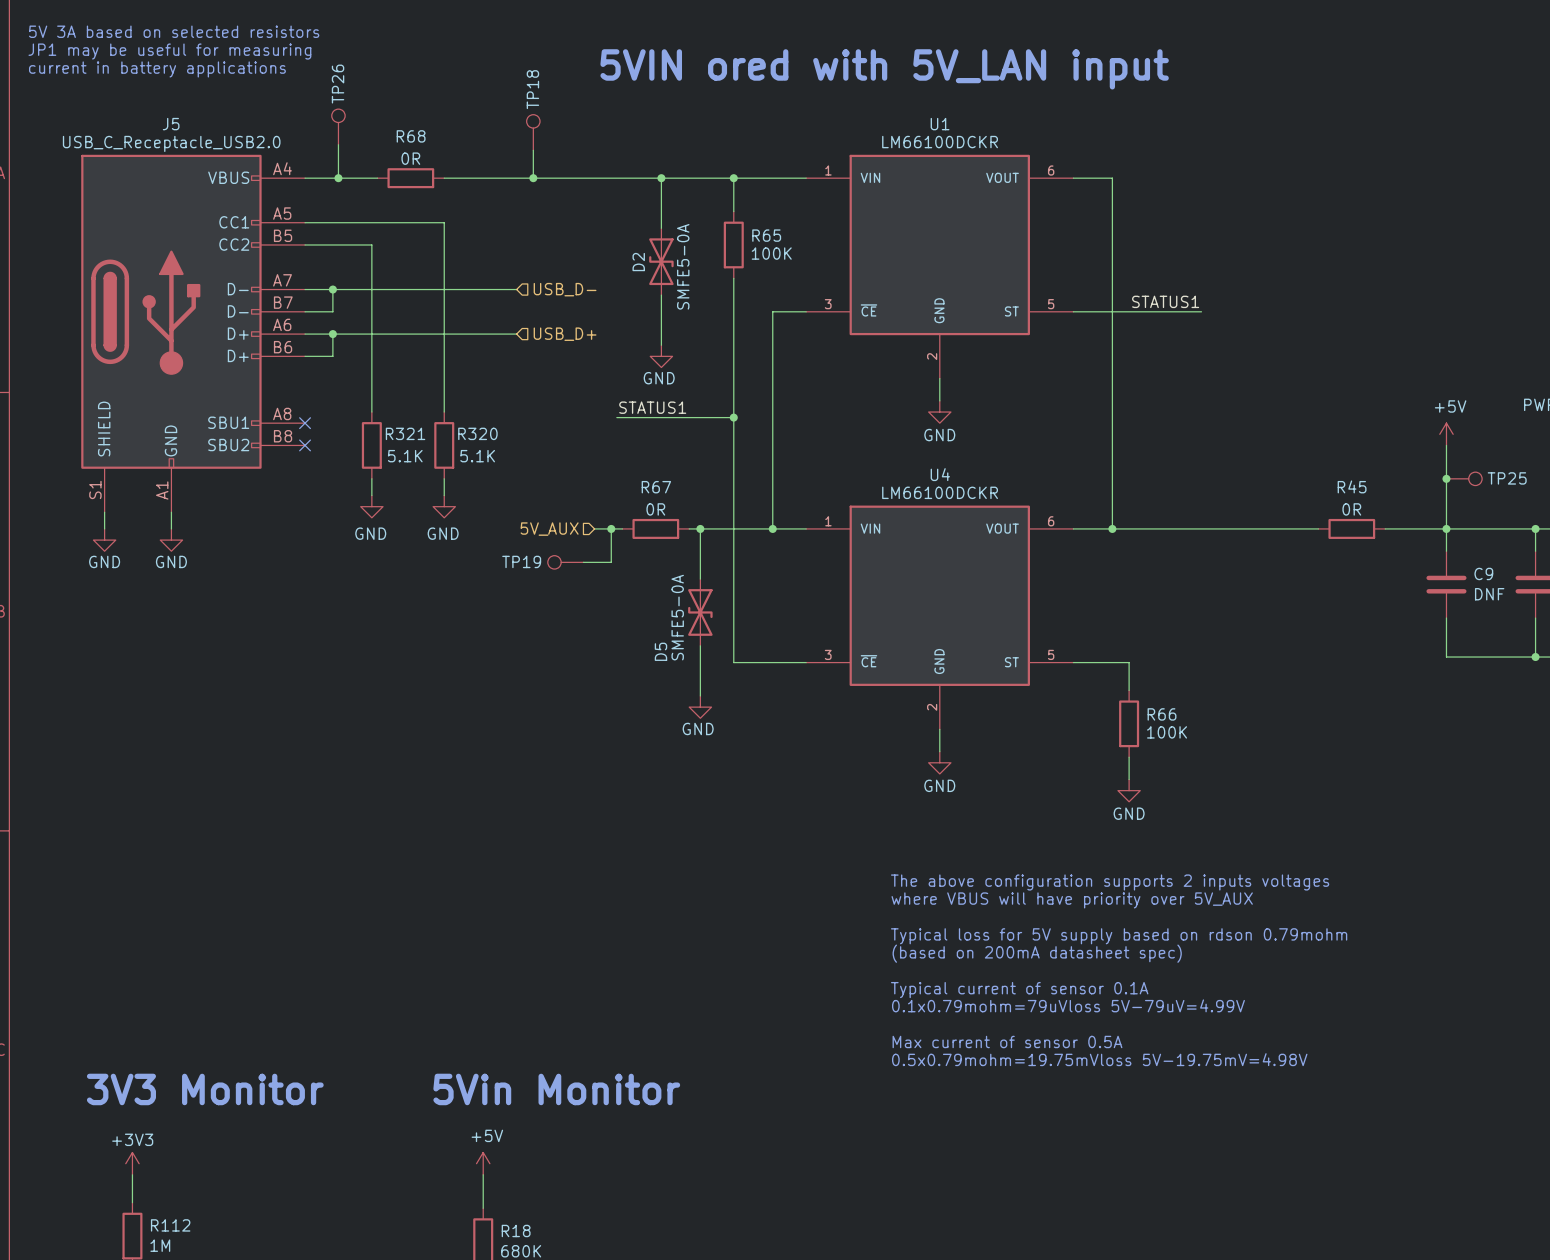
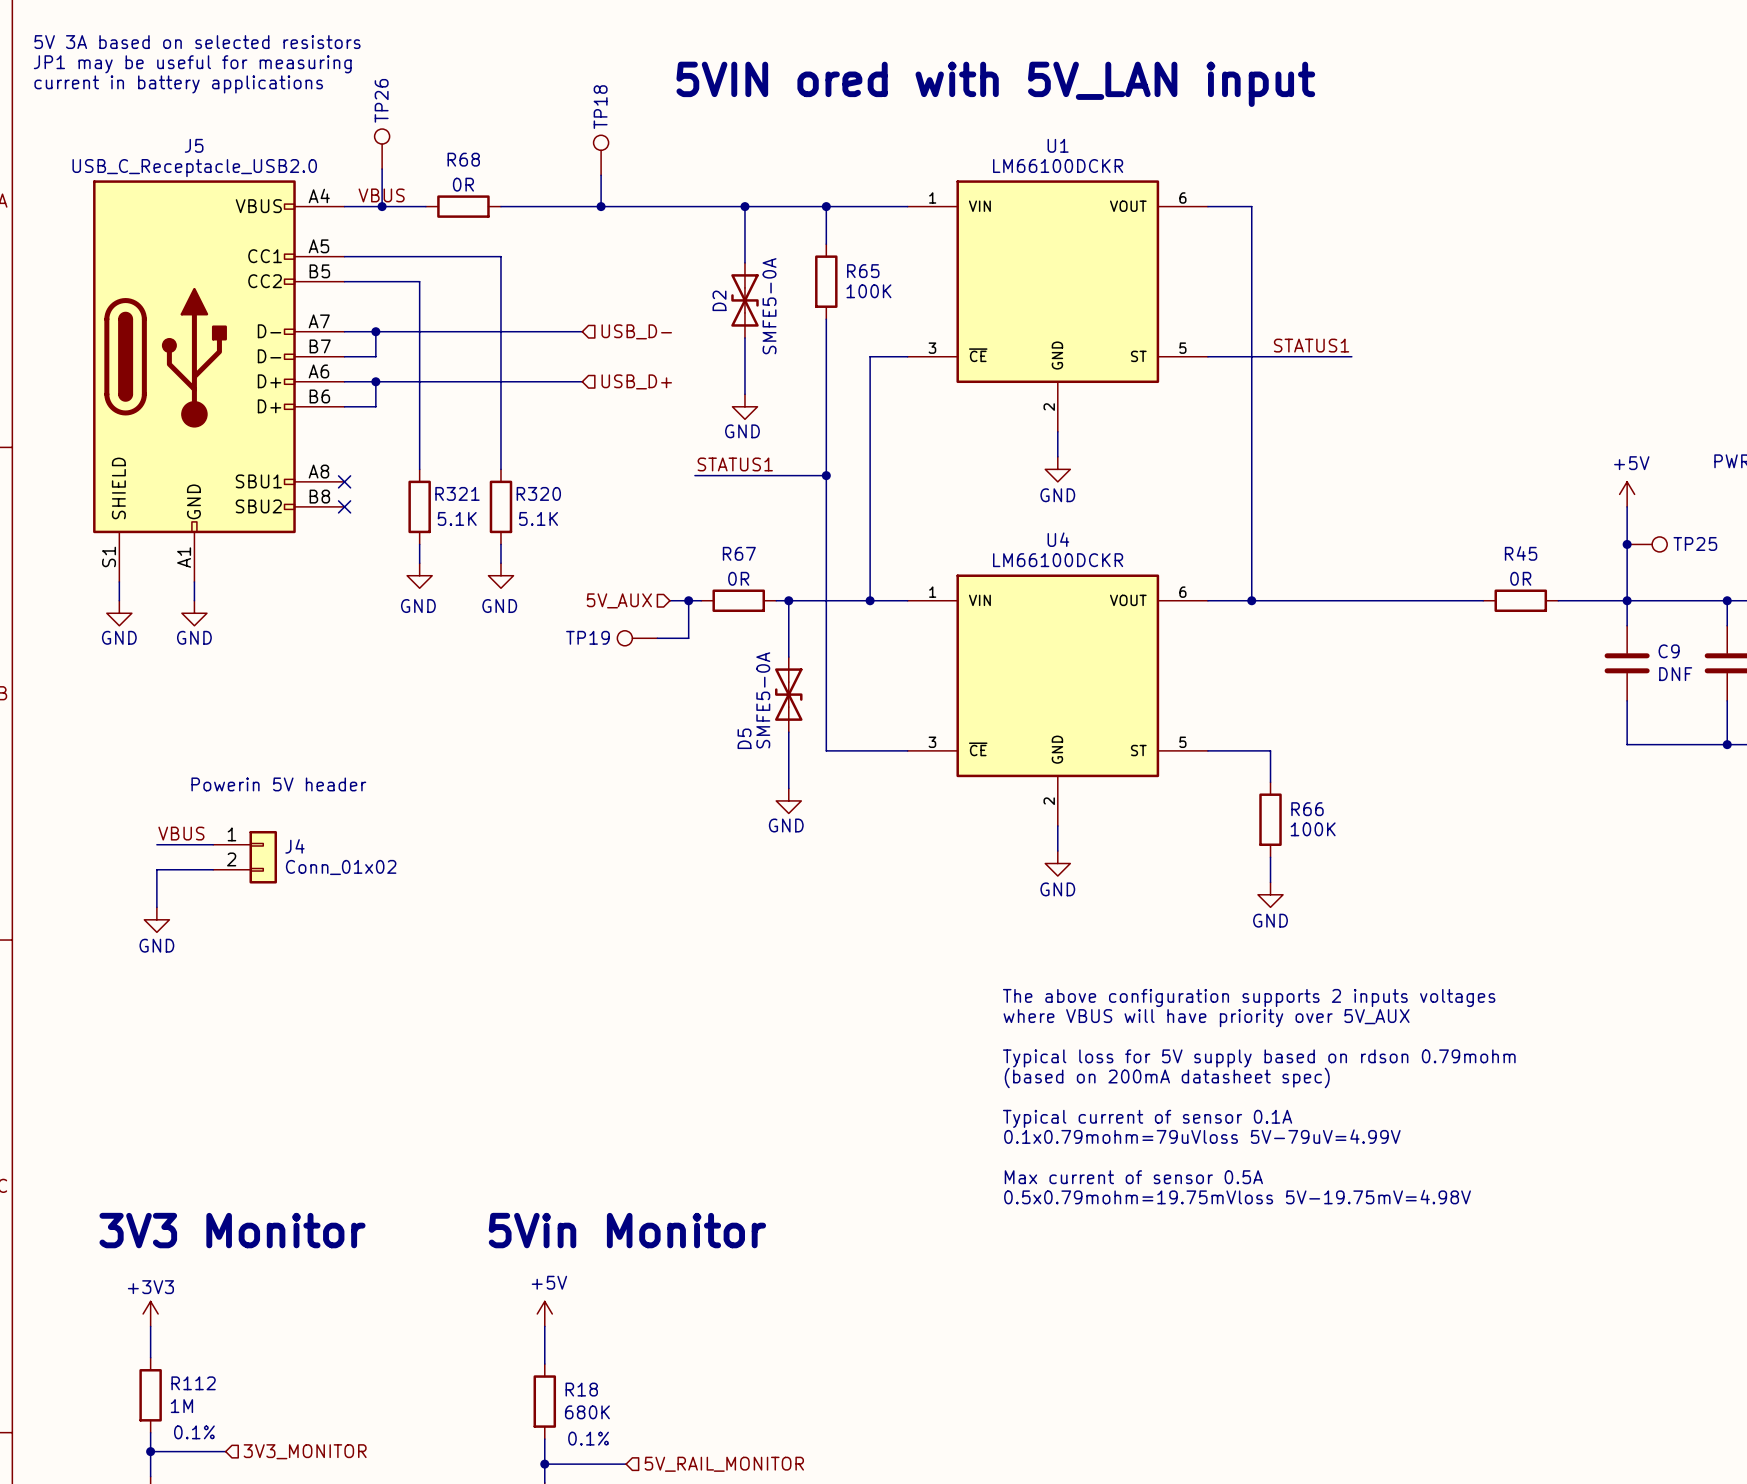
label: none -> VBUS (381, 195)
text: none -> Powerin 5V header (278, 784)
label: none -> VBUS (181, 833)
wire: none -> (156, 844) (213, 844)
J4: none -> Conn_01x02 (245, 857)
wire: none -> (213, 869) (156, 869) (156, 907)
power symbol: none -> GND (156, 919)

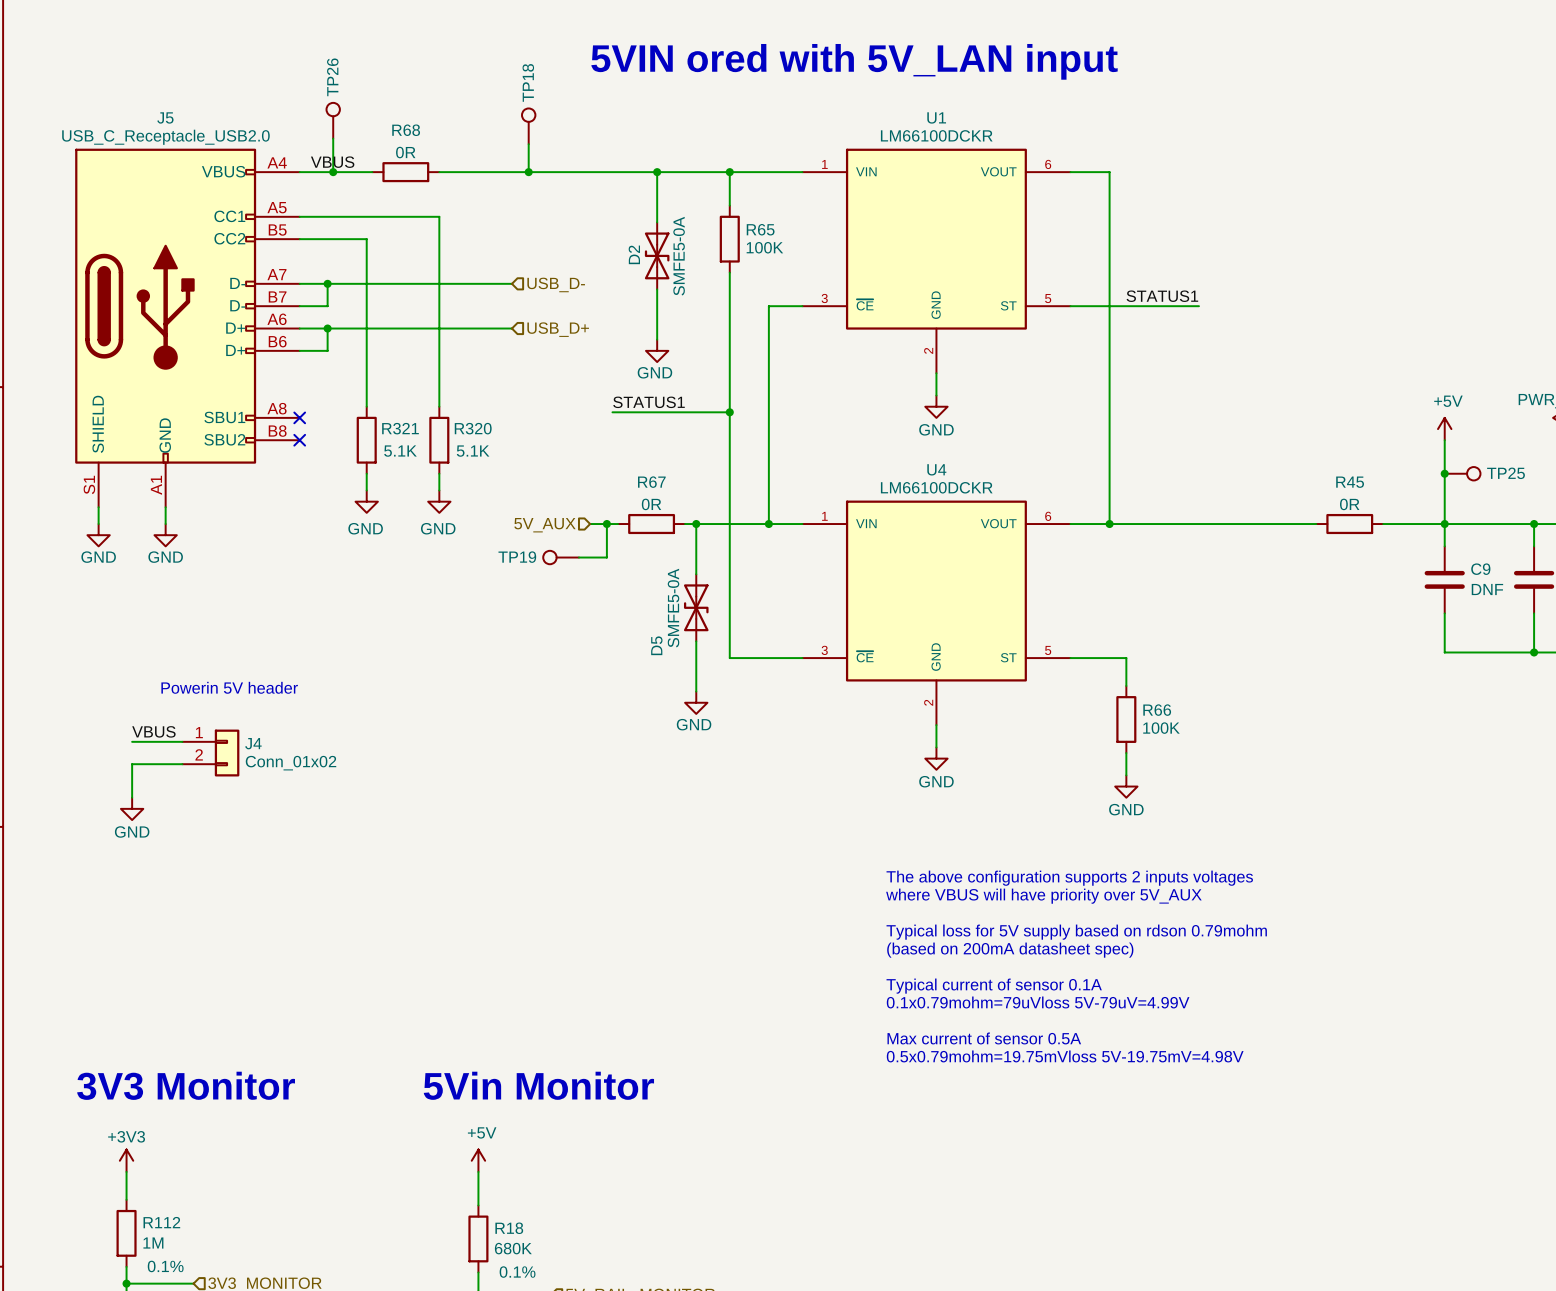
text: 5V 3A based on selected resistors (197, 42) -> none
text: JP1 may be useful for measuring (192, 64) -> none
text: current in battery applications (178, 84) -> none

